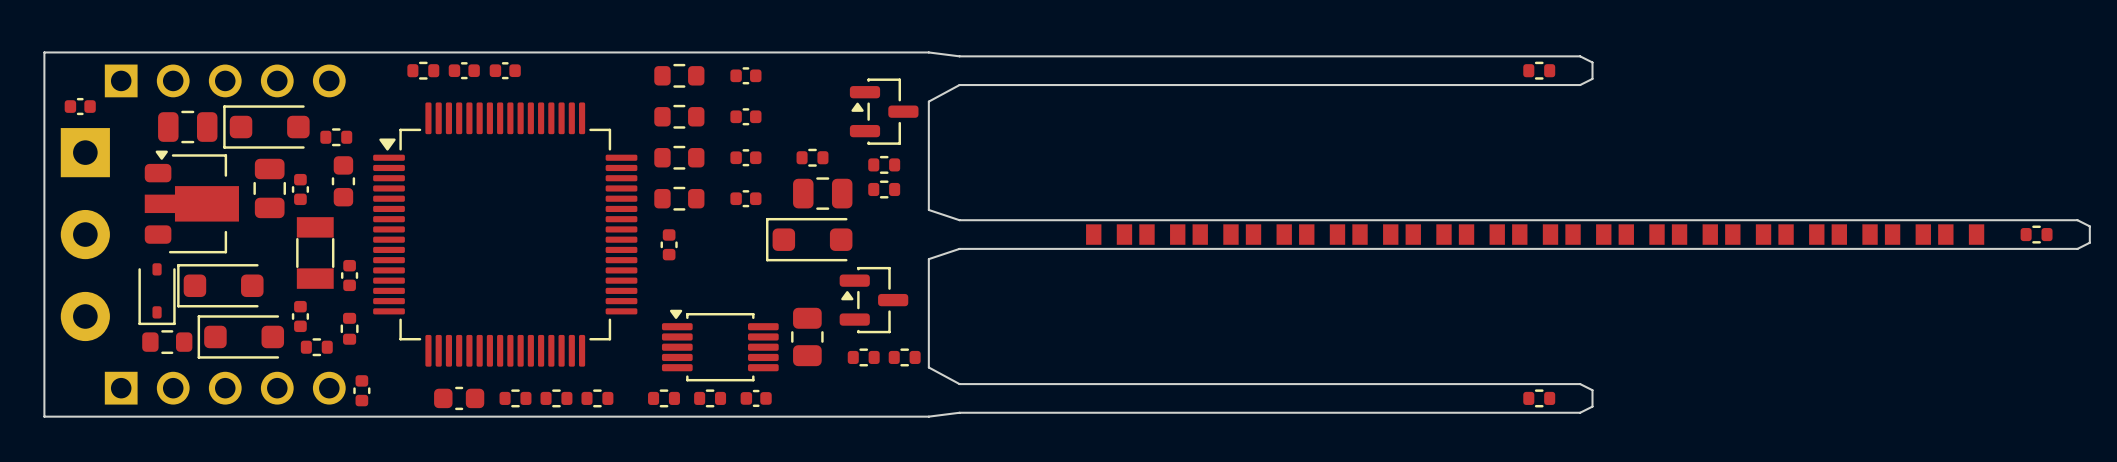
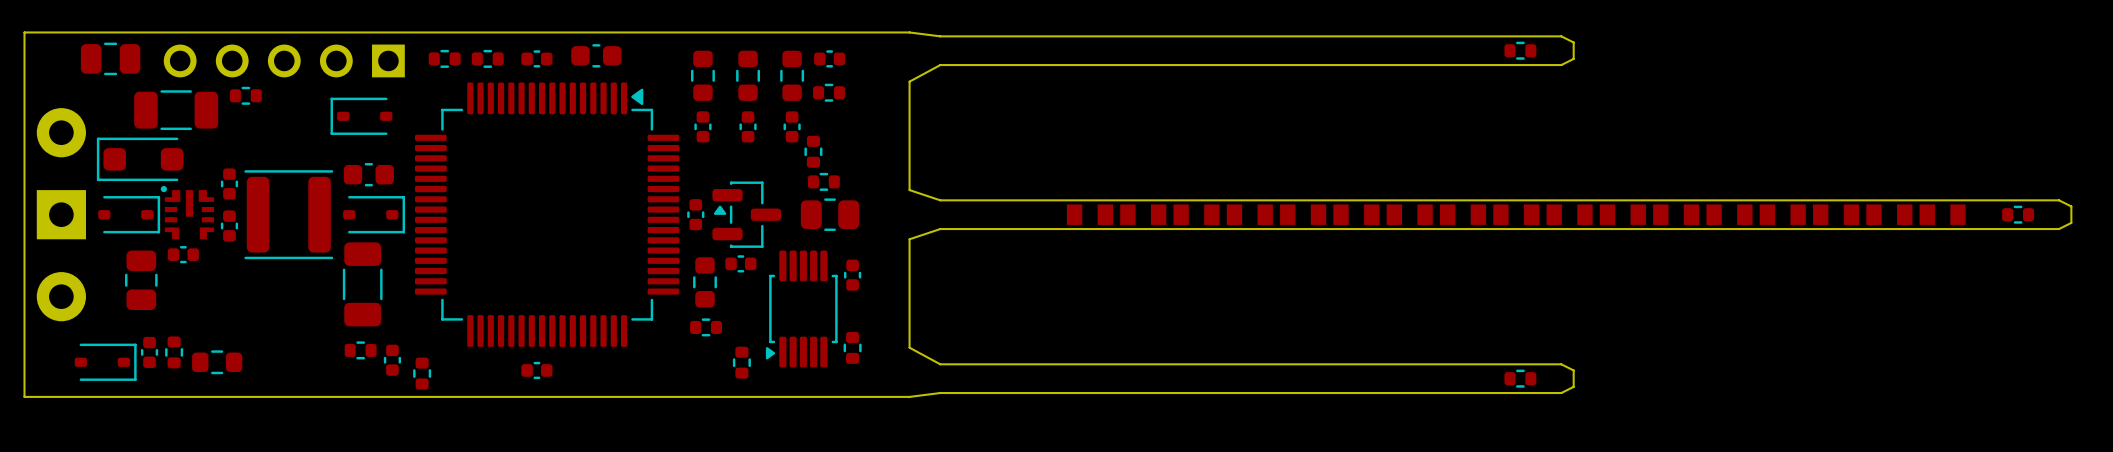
part footprint: [448, 62, 480, 80] -> [428, 49, 461, 68]
part footprint: [489, 62, 521, 80] -> [471, 49, 504, 68]
part: (423, 70) -> none
part: none -> (596, 55)
part: (679, 75) -> none
part: (745, 75) -> none
part: none -> (536, 58)
part: none -> (829, 58)
part rotation: 0° (225, 80) -> 180° (284, 60)
part: none -> (702, 75)
part: none -> (748, 75)
part: none -> (792, 75)
part footprint: [223, 105, 310, 149] -> [229, 86, 262, 105]
part: (80, 106) -> none
part footprint: [158, 110, 218, 144] -> [134, 90, 219, 131]
part position: (884, 111) -> (746, 214)
part: none -> (829, 92)
part: (679, 116) -> none
part: (745, 116) -> none
part footprint: [60, 128, 110, 342] -> [36, 108, 86, 322]
part: none -> (361, 116)
part: (336, 137) -> none
part: none -> (702, 126)
part: none -> (748, 126)
part footprint: [796, 148, 829, 167] -> [783, 111, 801, 143]
part: (679, 157) -> none
part: (745, 157) -> none
part: (884, 164) -> none
part: none -> (813, 151)
part: none -> (140, 159)
part rotation: 0° (343, 181) -> 90° clockwise (368, 174)
part position: (343, 181) -> (368, 174)
part rotation: 0° (269, 188) -> 90° clockwise (110, 58)
part position: (269, 188) -> (110, 58)
part: (300, 189) -> none
part: (884, 189) -> none
part: (822, 193) -> none
part: (679, 198) -> none
part: (745, 198) -> none
part: (191, 201) -> none
part: none -> (823, 181)
part: none -> (229, 183)
part footprint: [296, 217, 335, 289] -> [244, 170, 334, 260]
part: none -> (187, 212)
part: none -> (129, 214)
part: none -> (374, 214)
part rotation: 0° (505, 234) -> 90° clockwise (547, 214)
part: none -> (695, 214)
part: none -> (830, 214)
part: (809, 239) -> none
part: (669, 244) -> none
part: none -> (229, 225)
part footprint: [138, 263, 176, 326] -> [125, 250, 158, 311]
part footprint: [839, 266, 909, 334] -> [843, 259, 862, 291]
part: none -> (183, 254)
part: (349, 275) -> none
part: none -> (740, 263)
part: (220, 285) -> none
part: none -> (705, 282)
part: none -> (362, 284)
part footprint: [791, 307, 824, 367] -> [765, 250, 838, 368]
part footprint: [661, 309, 779, 382] -> [690, 318, 723, 337]
part: (300, 316) -> none
part: (349, 328) -> none
part: (240, 336) -> none
part: (167, 342) -> none
part: (316, 347) -> none
part rotation: 0° (863, 357) -> 90° clockwise (852, 347)
part: (904, 357) -> none
part: none -> (360, 350)
part footprint: [104, 371, 346, 405] -> [192, 350, 243, 375]
part: none -> (149, 352)
part: none -> (174, 352)
part: none -> (105, 362)
part footprint: [434, 386, 485, 411] -> [413, 357, 432, 390]
part footprint: [540, 389, 573, 408] -> [521, 361, 553, 380]
part footprint: [740, 389, 772, 408] -> [732, 346, 751, 379]
part position: (361, 390) -> (392, 360)
part: (515, 398) -> none
part: (597, 398) -> none
part: (664, 398) -> none
part: (710, 398) -> none

